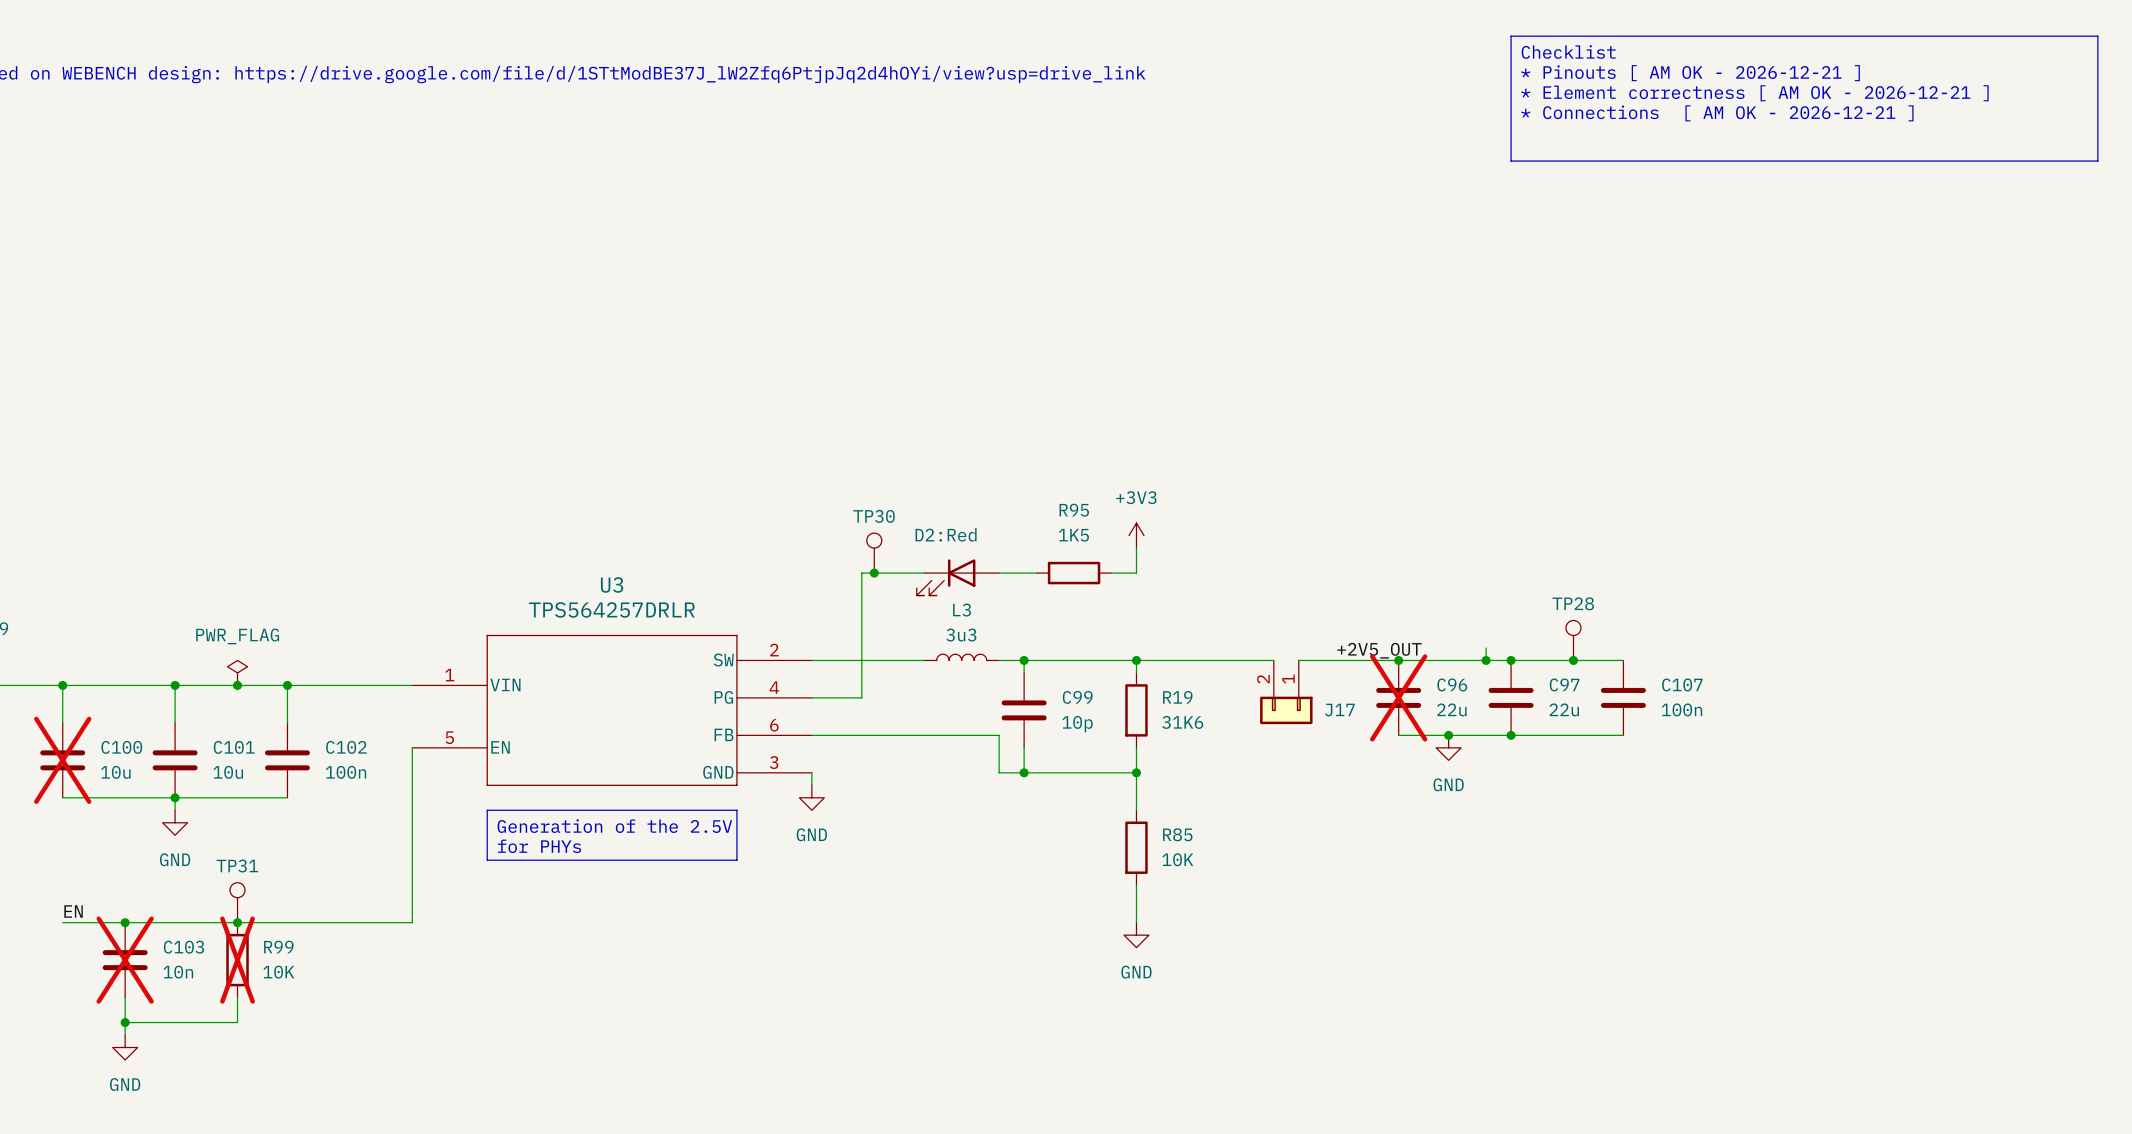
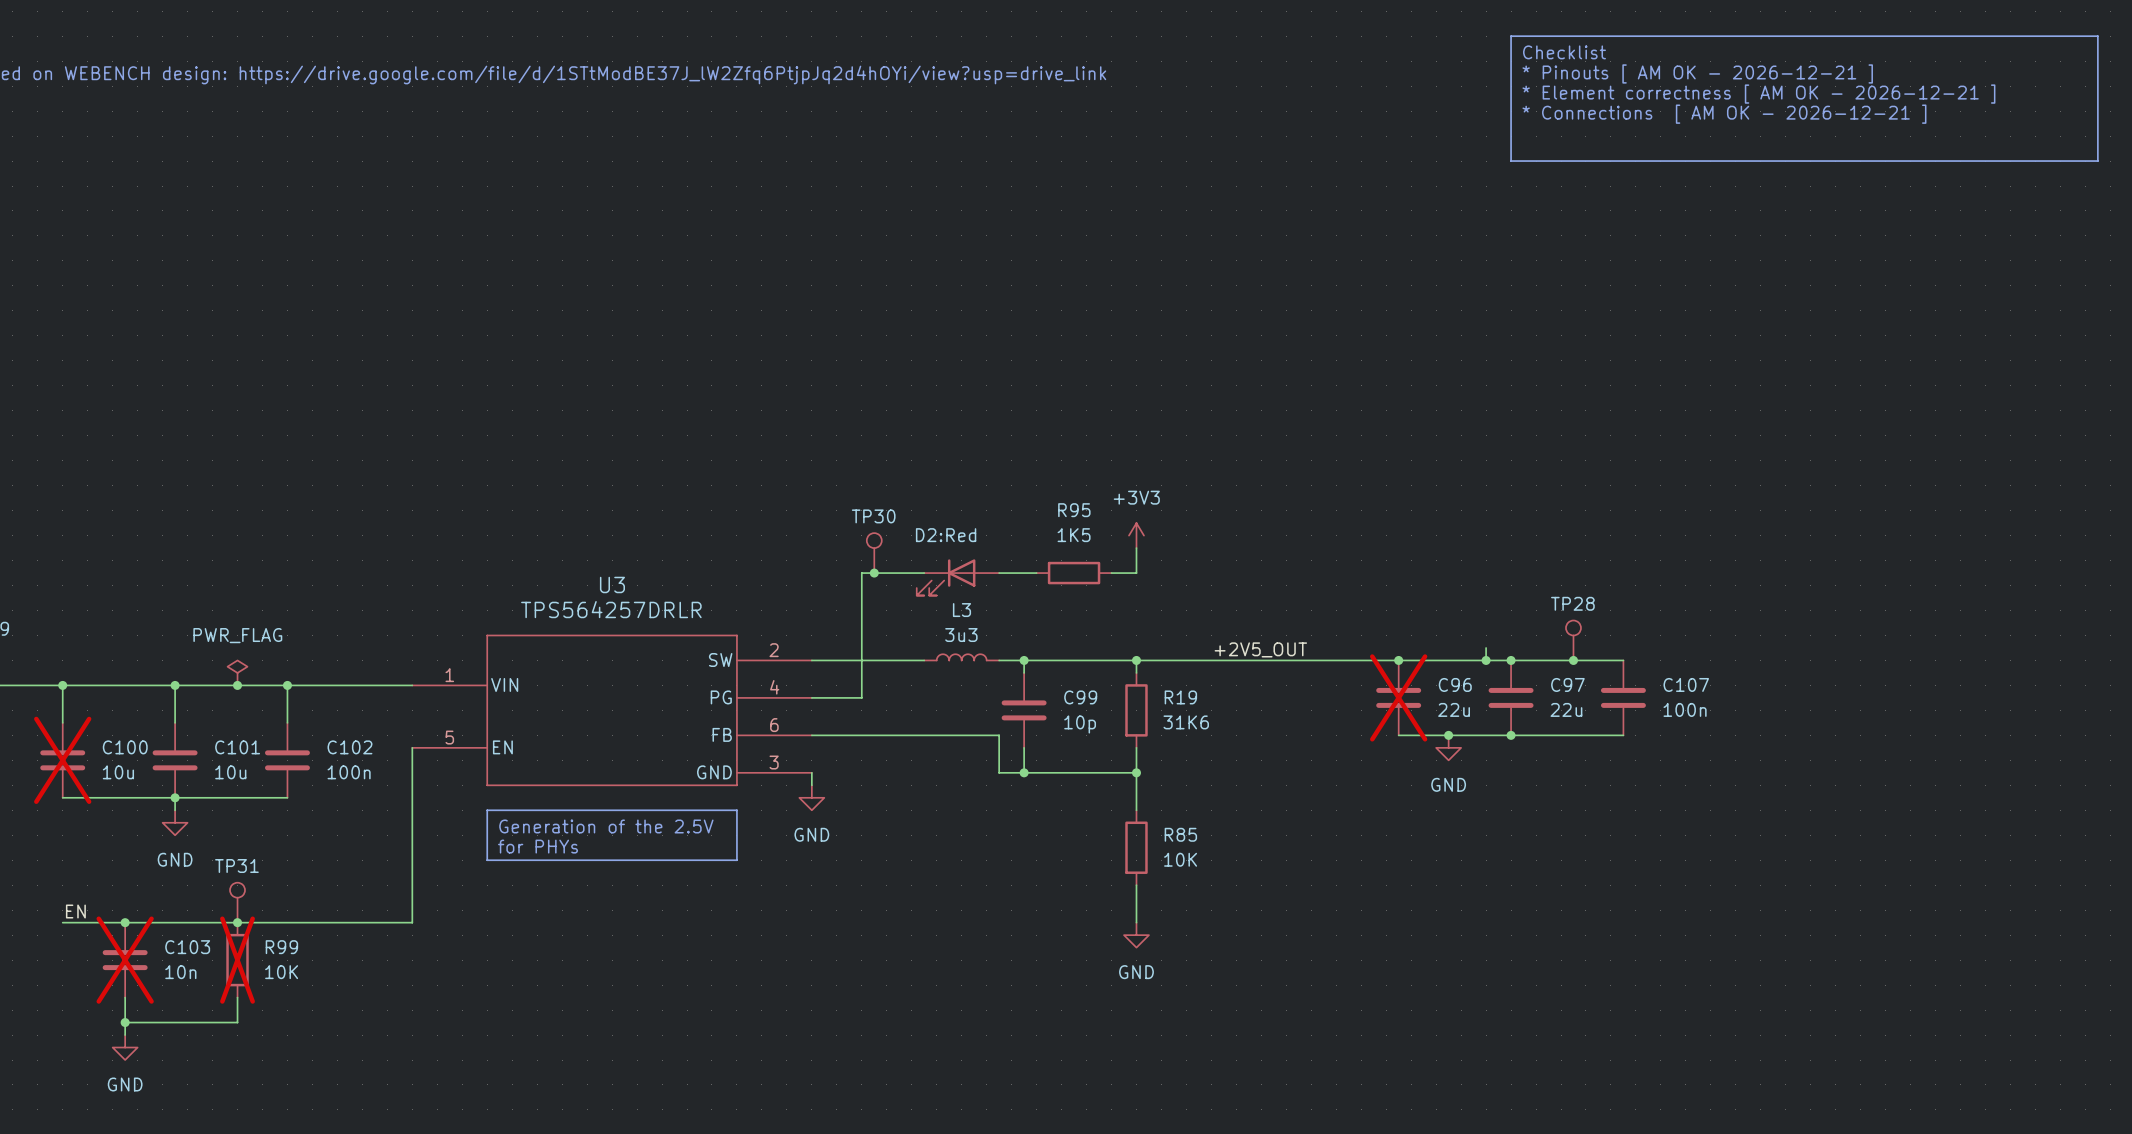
label position: +2V5_OUT (1379, 650) -> +2V5_OUT (1260, 649)
wire: none -> (1273, 660) (1298, 660)
J17: (1286, 692) -> none

